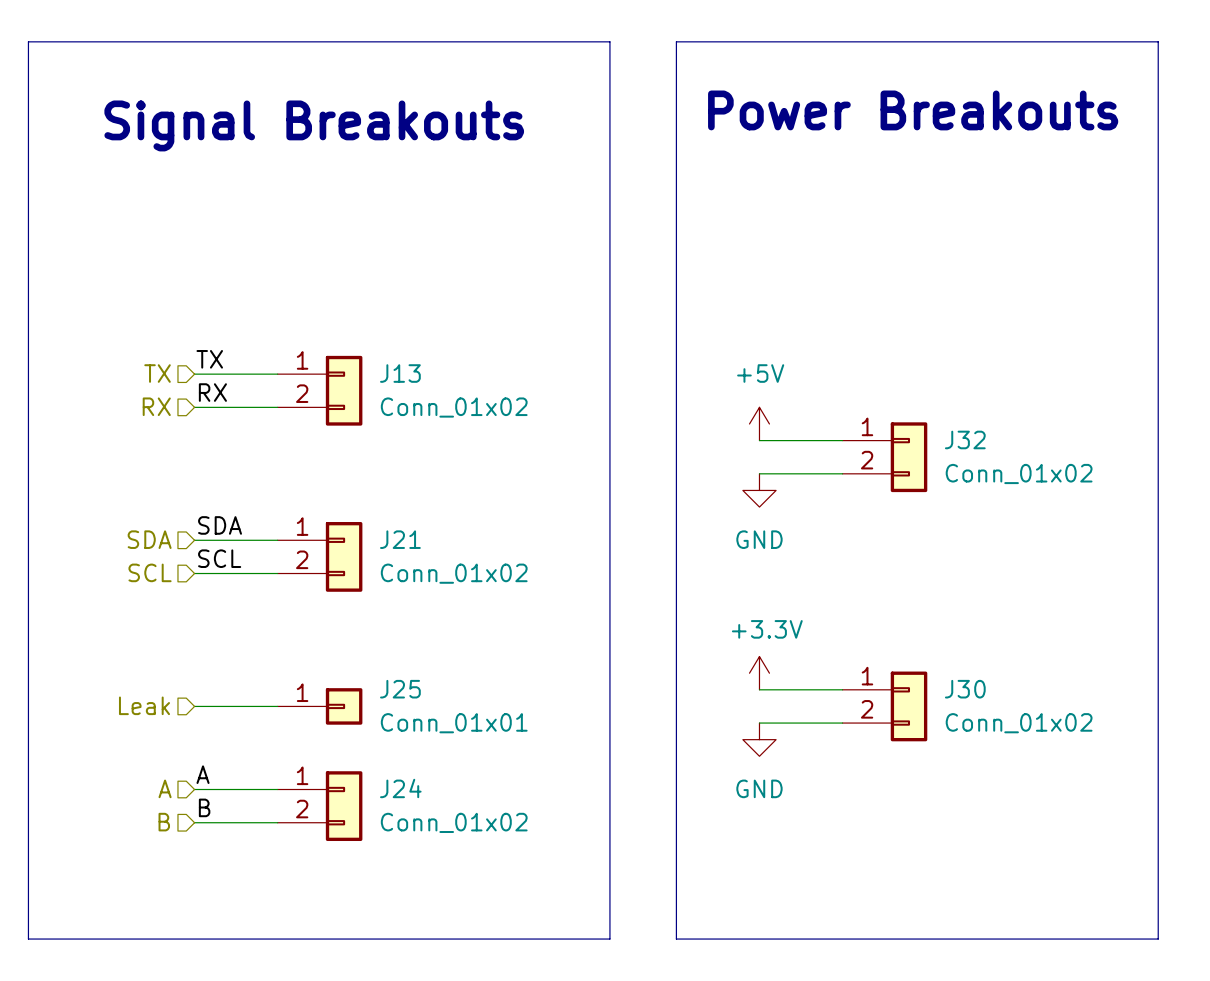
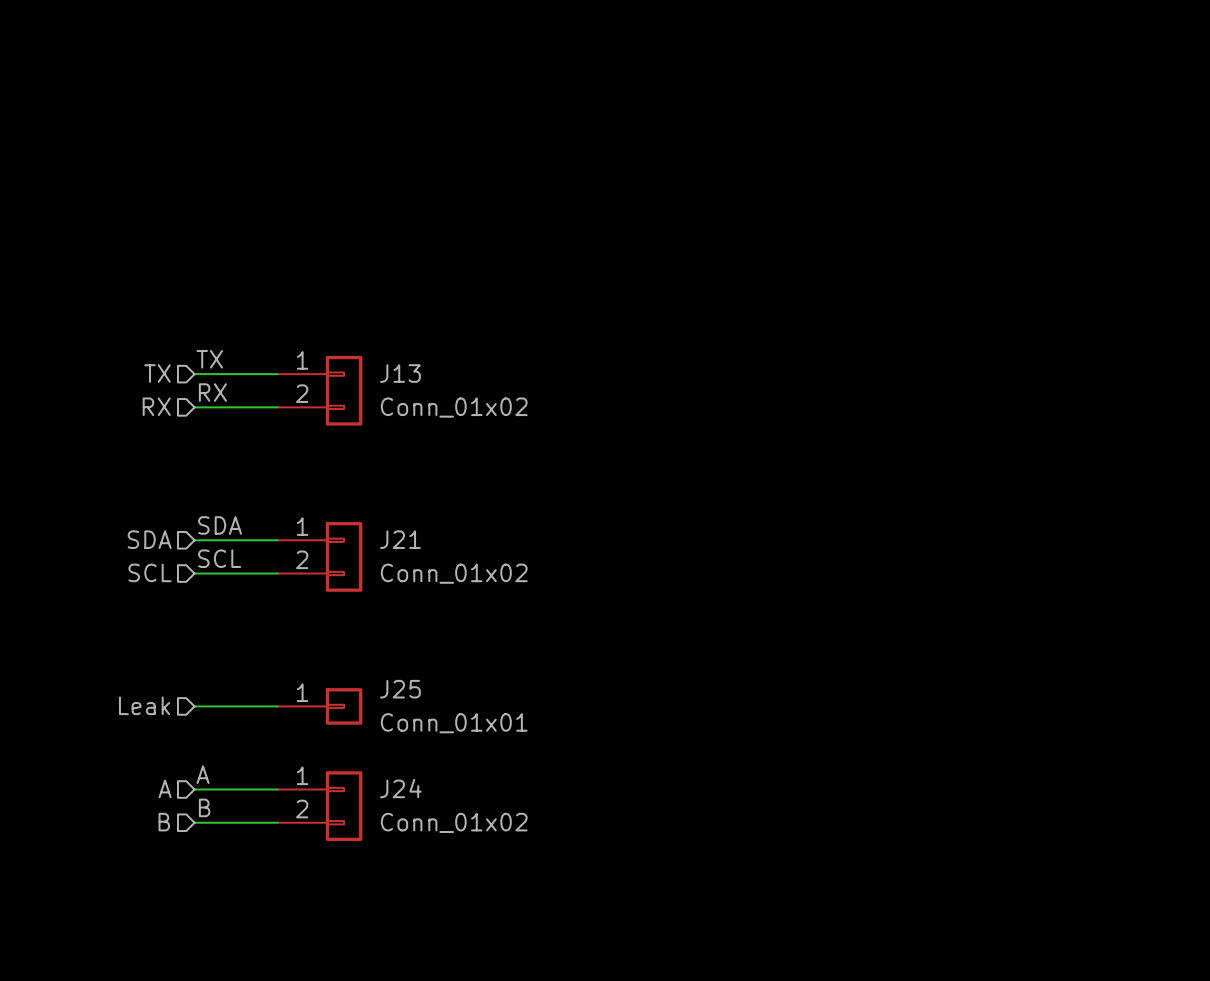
line: (28, 41) (609, 41) (609, 939) (28, 939) (28, 41) -> none
line: (676, 41) (1158, 41) (1158, 939) (676, 939) (676, 41) -> none
text: Power Breakouts (913, 110) -> none
text: Signal Breakouts (314, 125) -> none
power symbol: +5V (759, 423) -> none
wire: (759, 440) (842, 440) -> none
J32: Conn_01x02 (884, 457) -> none
wire: (759, 473) (842, 473) -> none
power symbol: GND (759, 490) -> none
power symbol: +3.3V (759, 673) -> none
wire: (759, 689) (842, 689) -> none
J30: Conn_01x02 (884, 706) -> none
wire: (759, 723) (842, 723) -> none
power symbol: GND (759, 739) -> none

